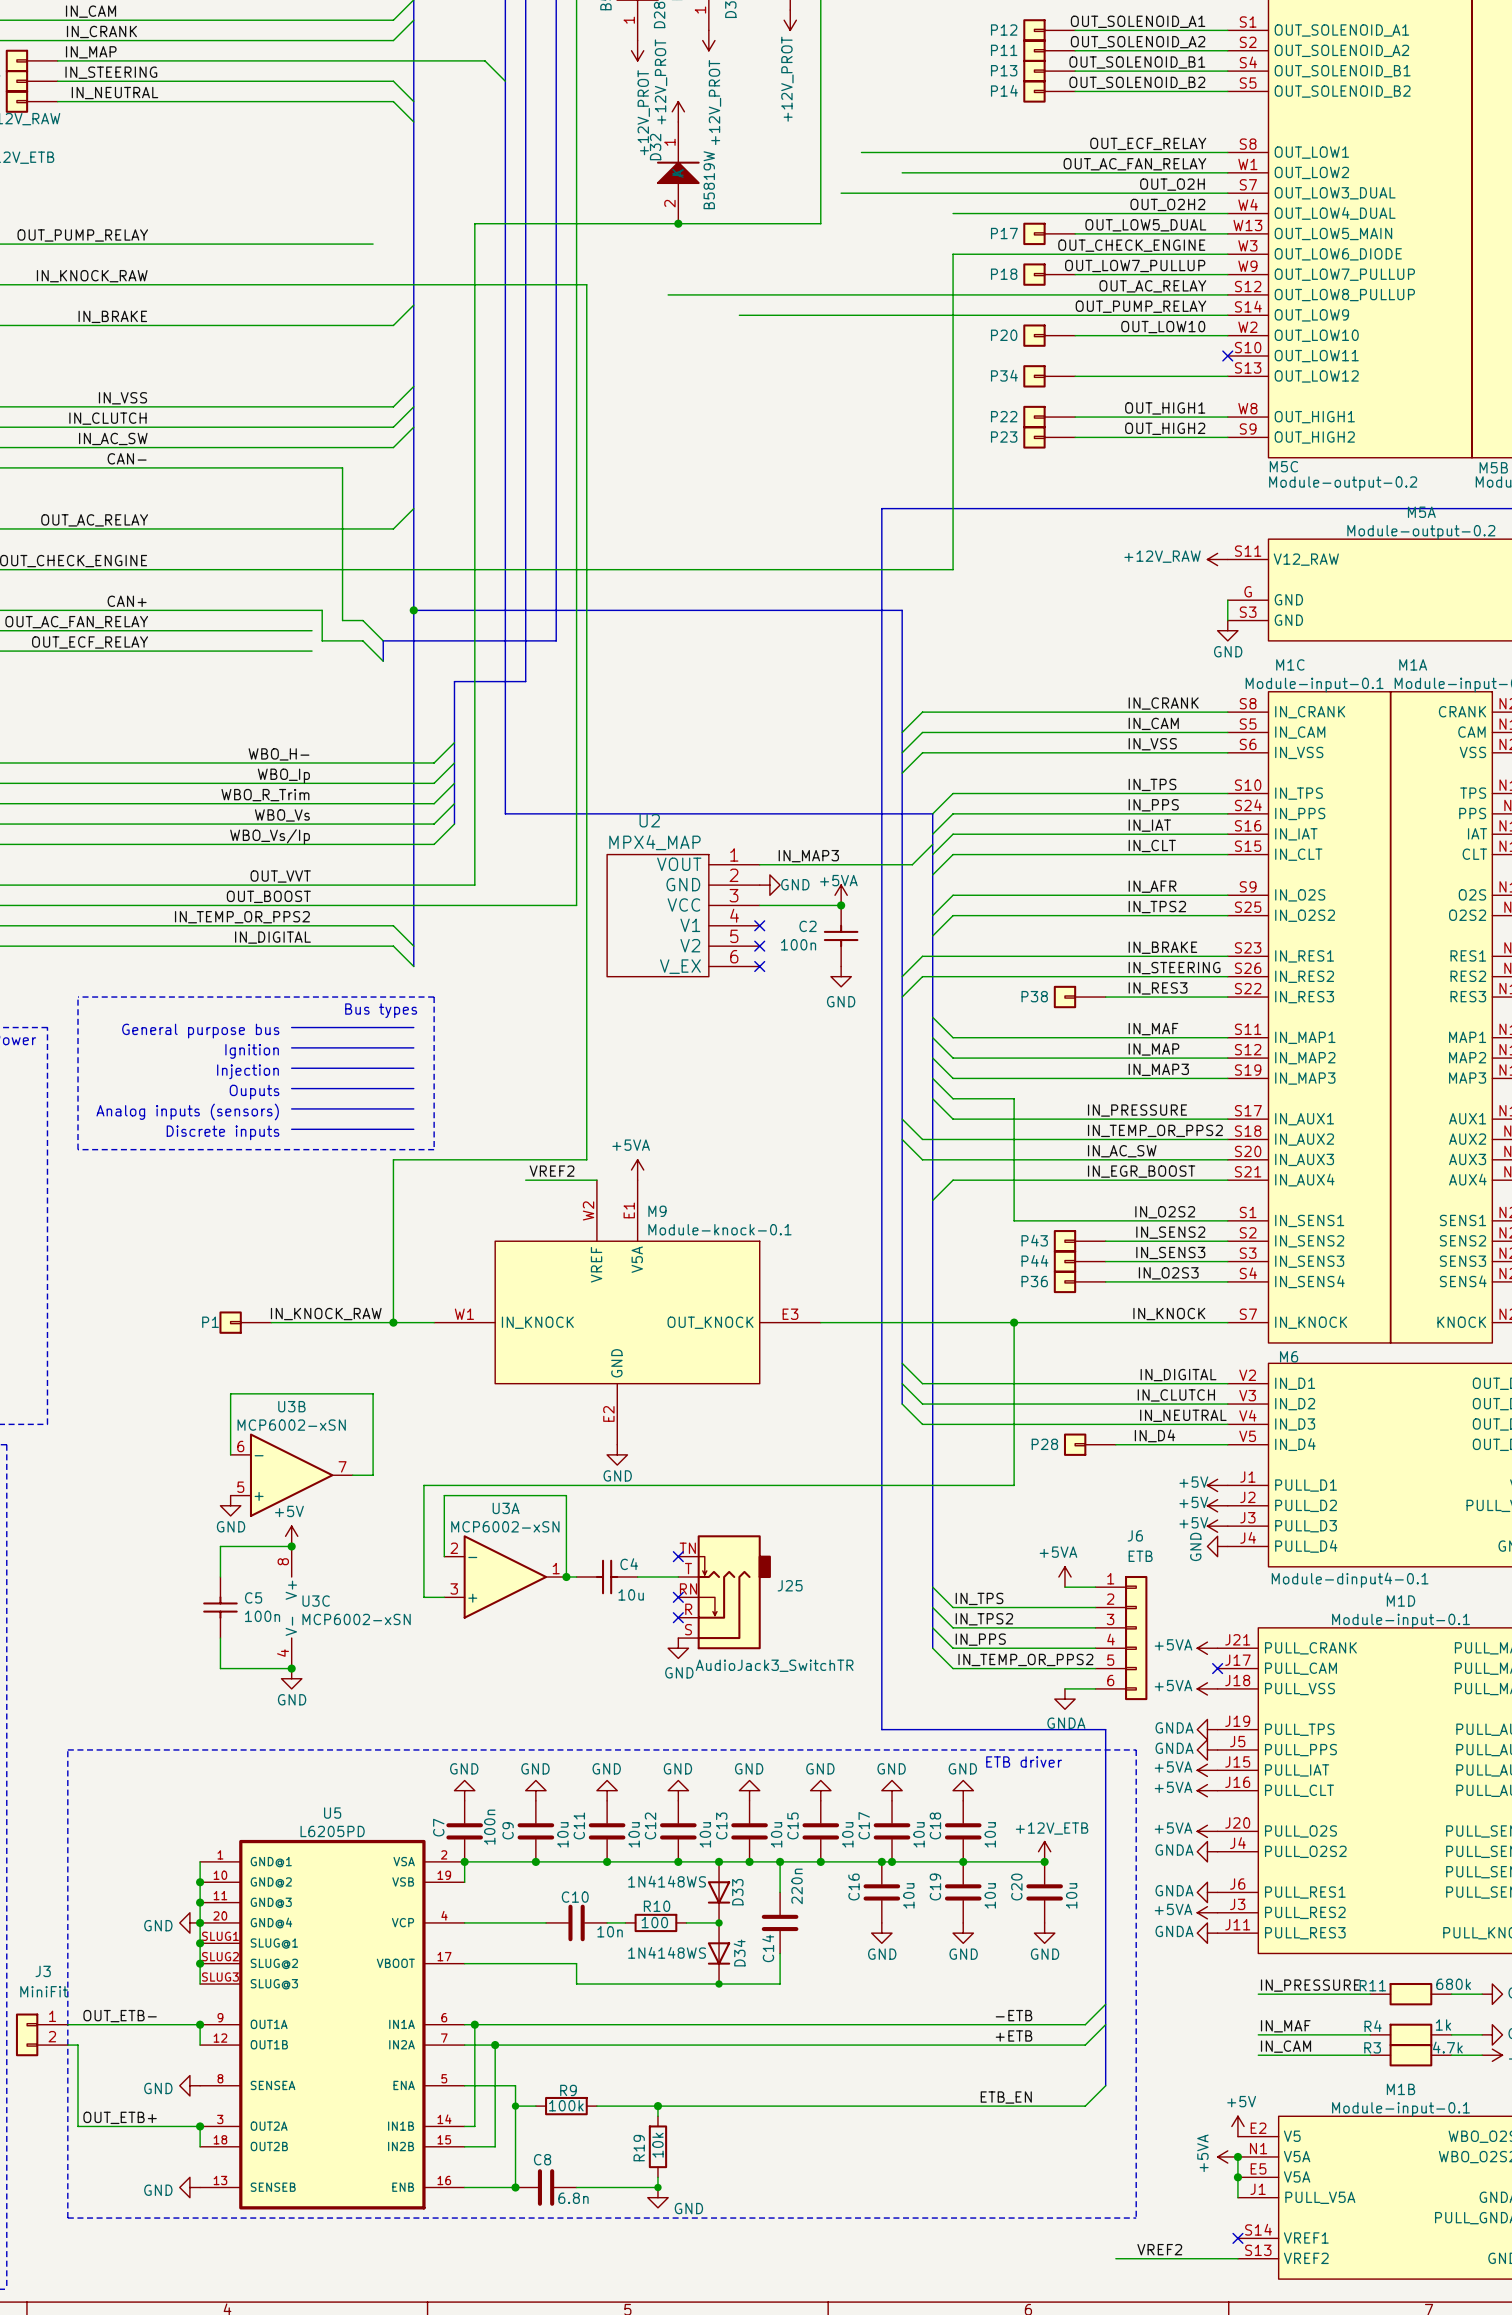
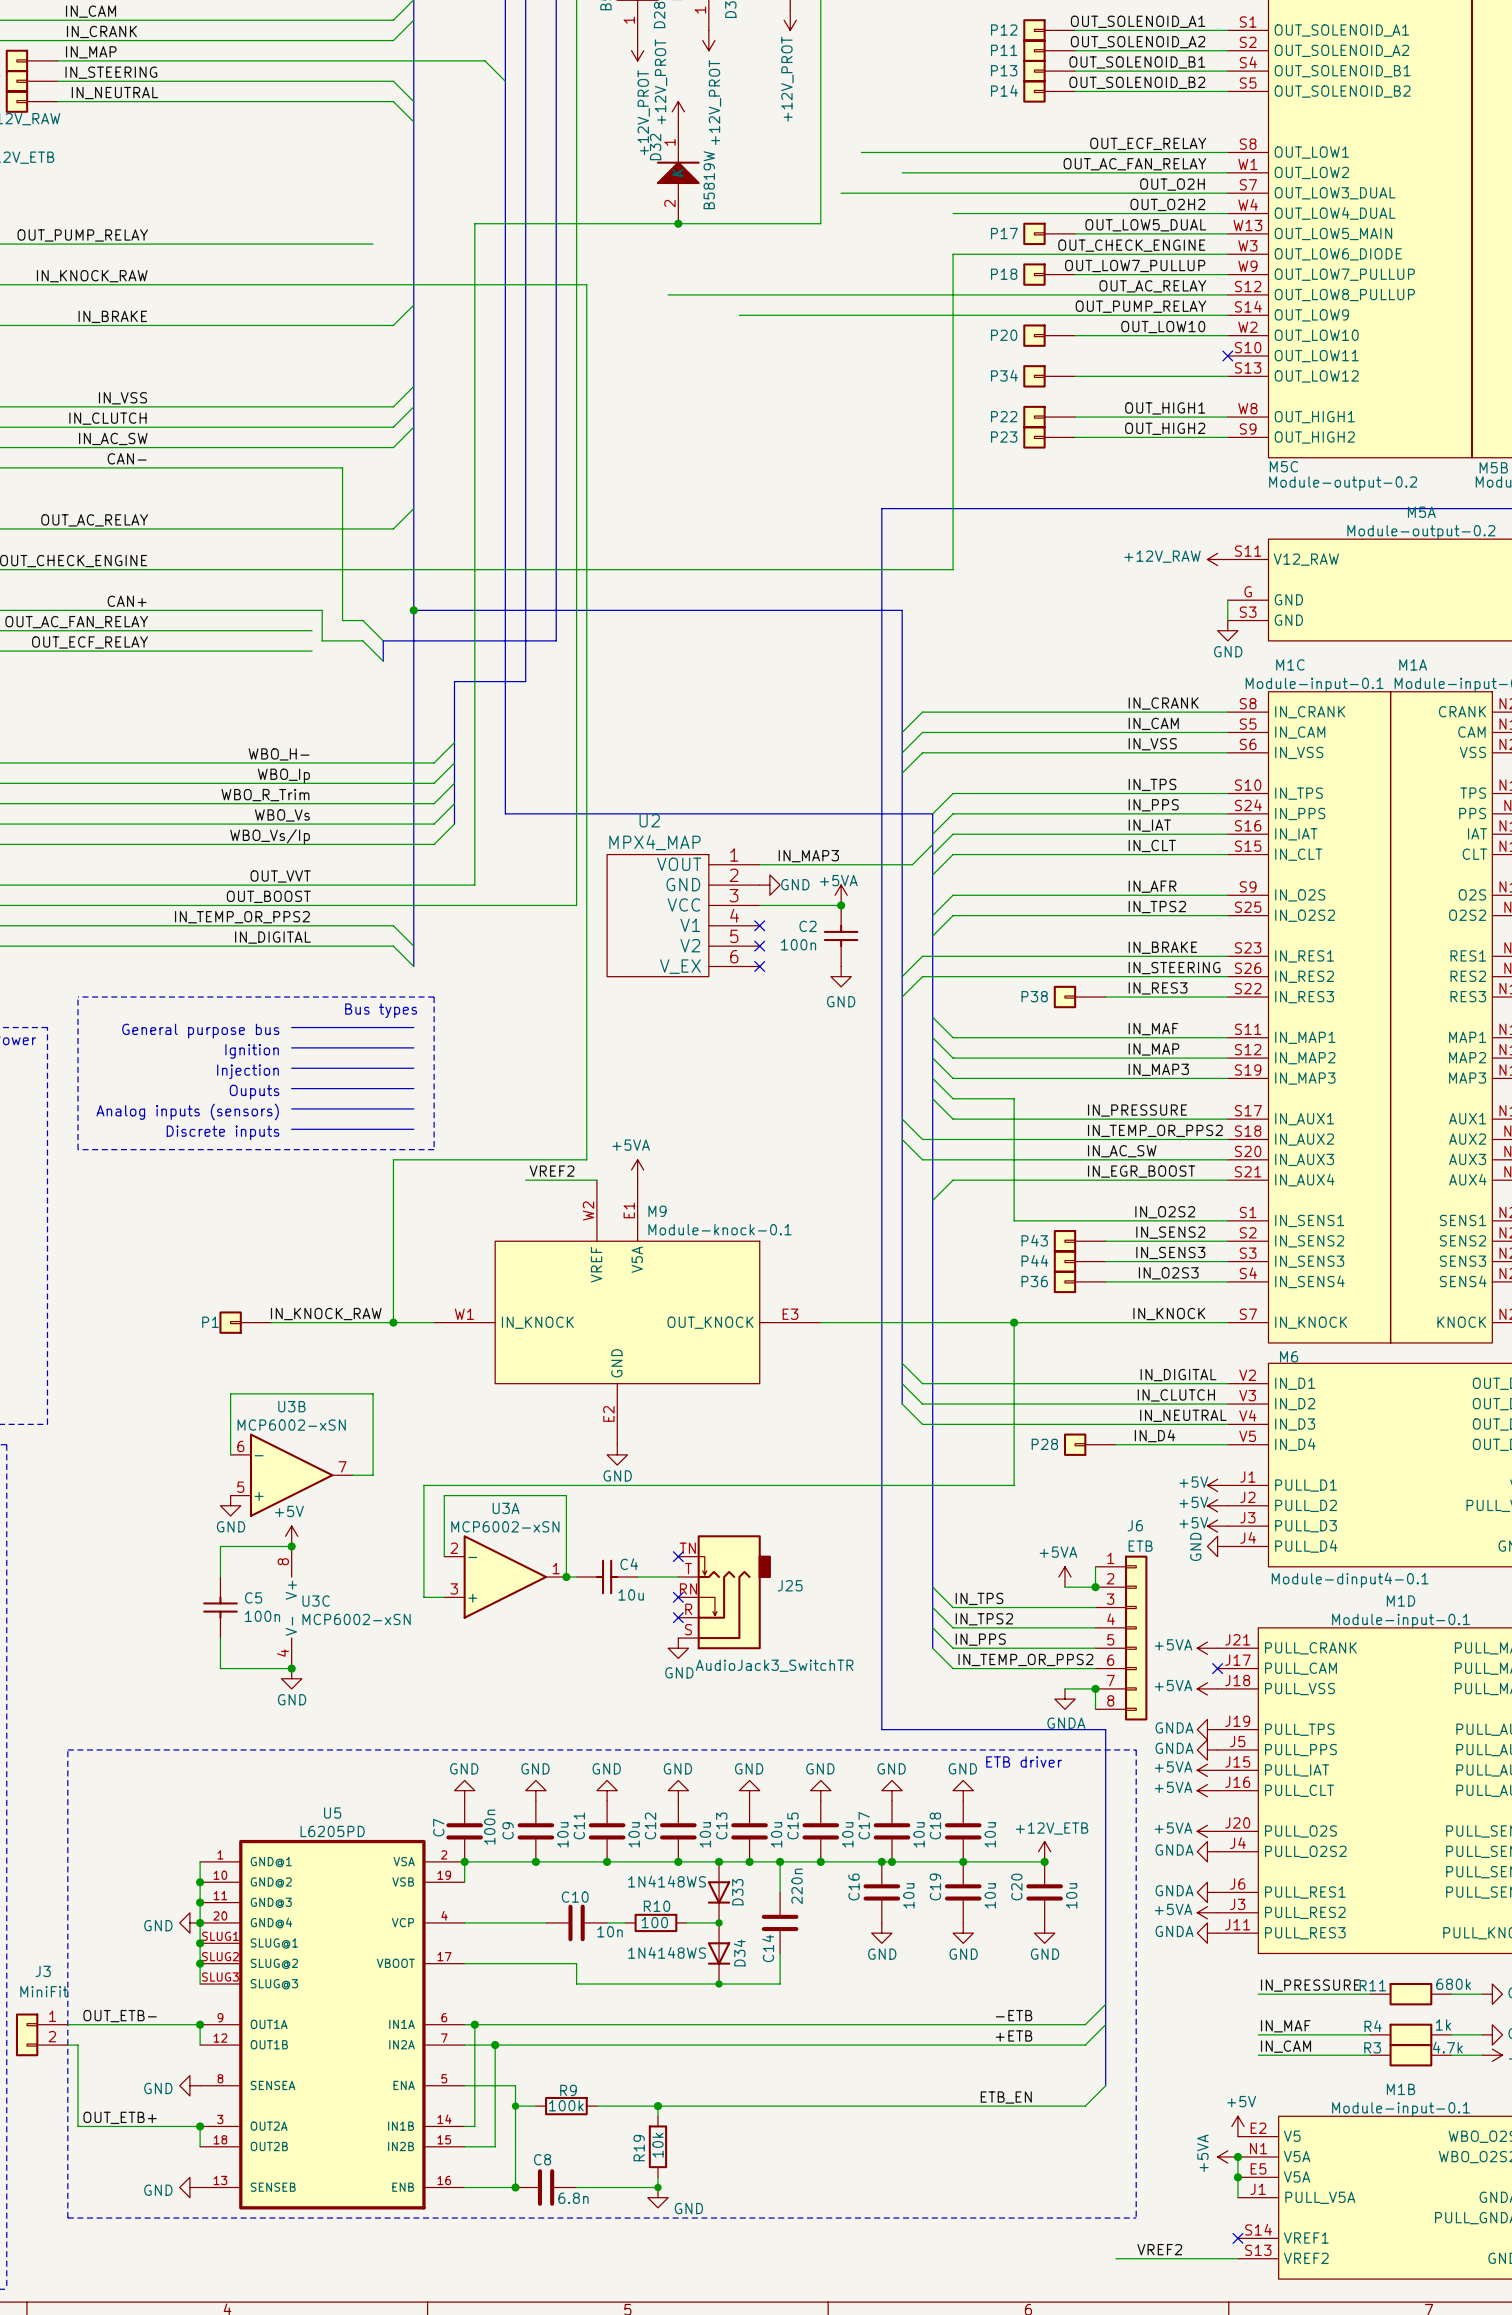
wire: none -> (1095, 1566) (1095, 1587)
J6 symbol: [1095, 1575, 1148, 1701] -> [1095, 1555, 1148, 1721]
junction: none -> (1095, 1587)
wire: none -> (1095, 1688) (1095, 1709)
junction: none -> (1095, 1688)

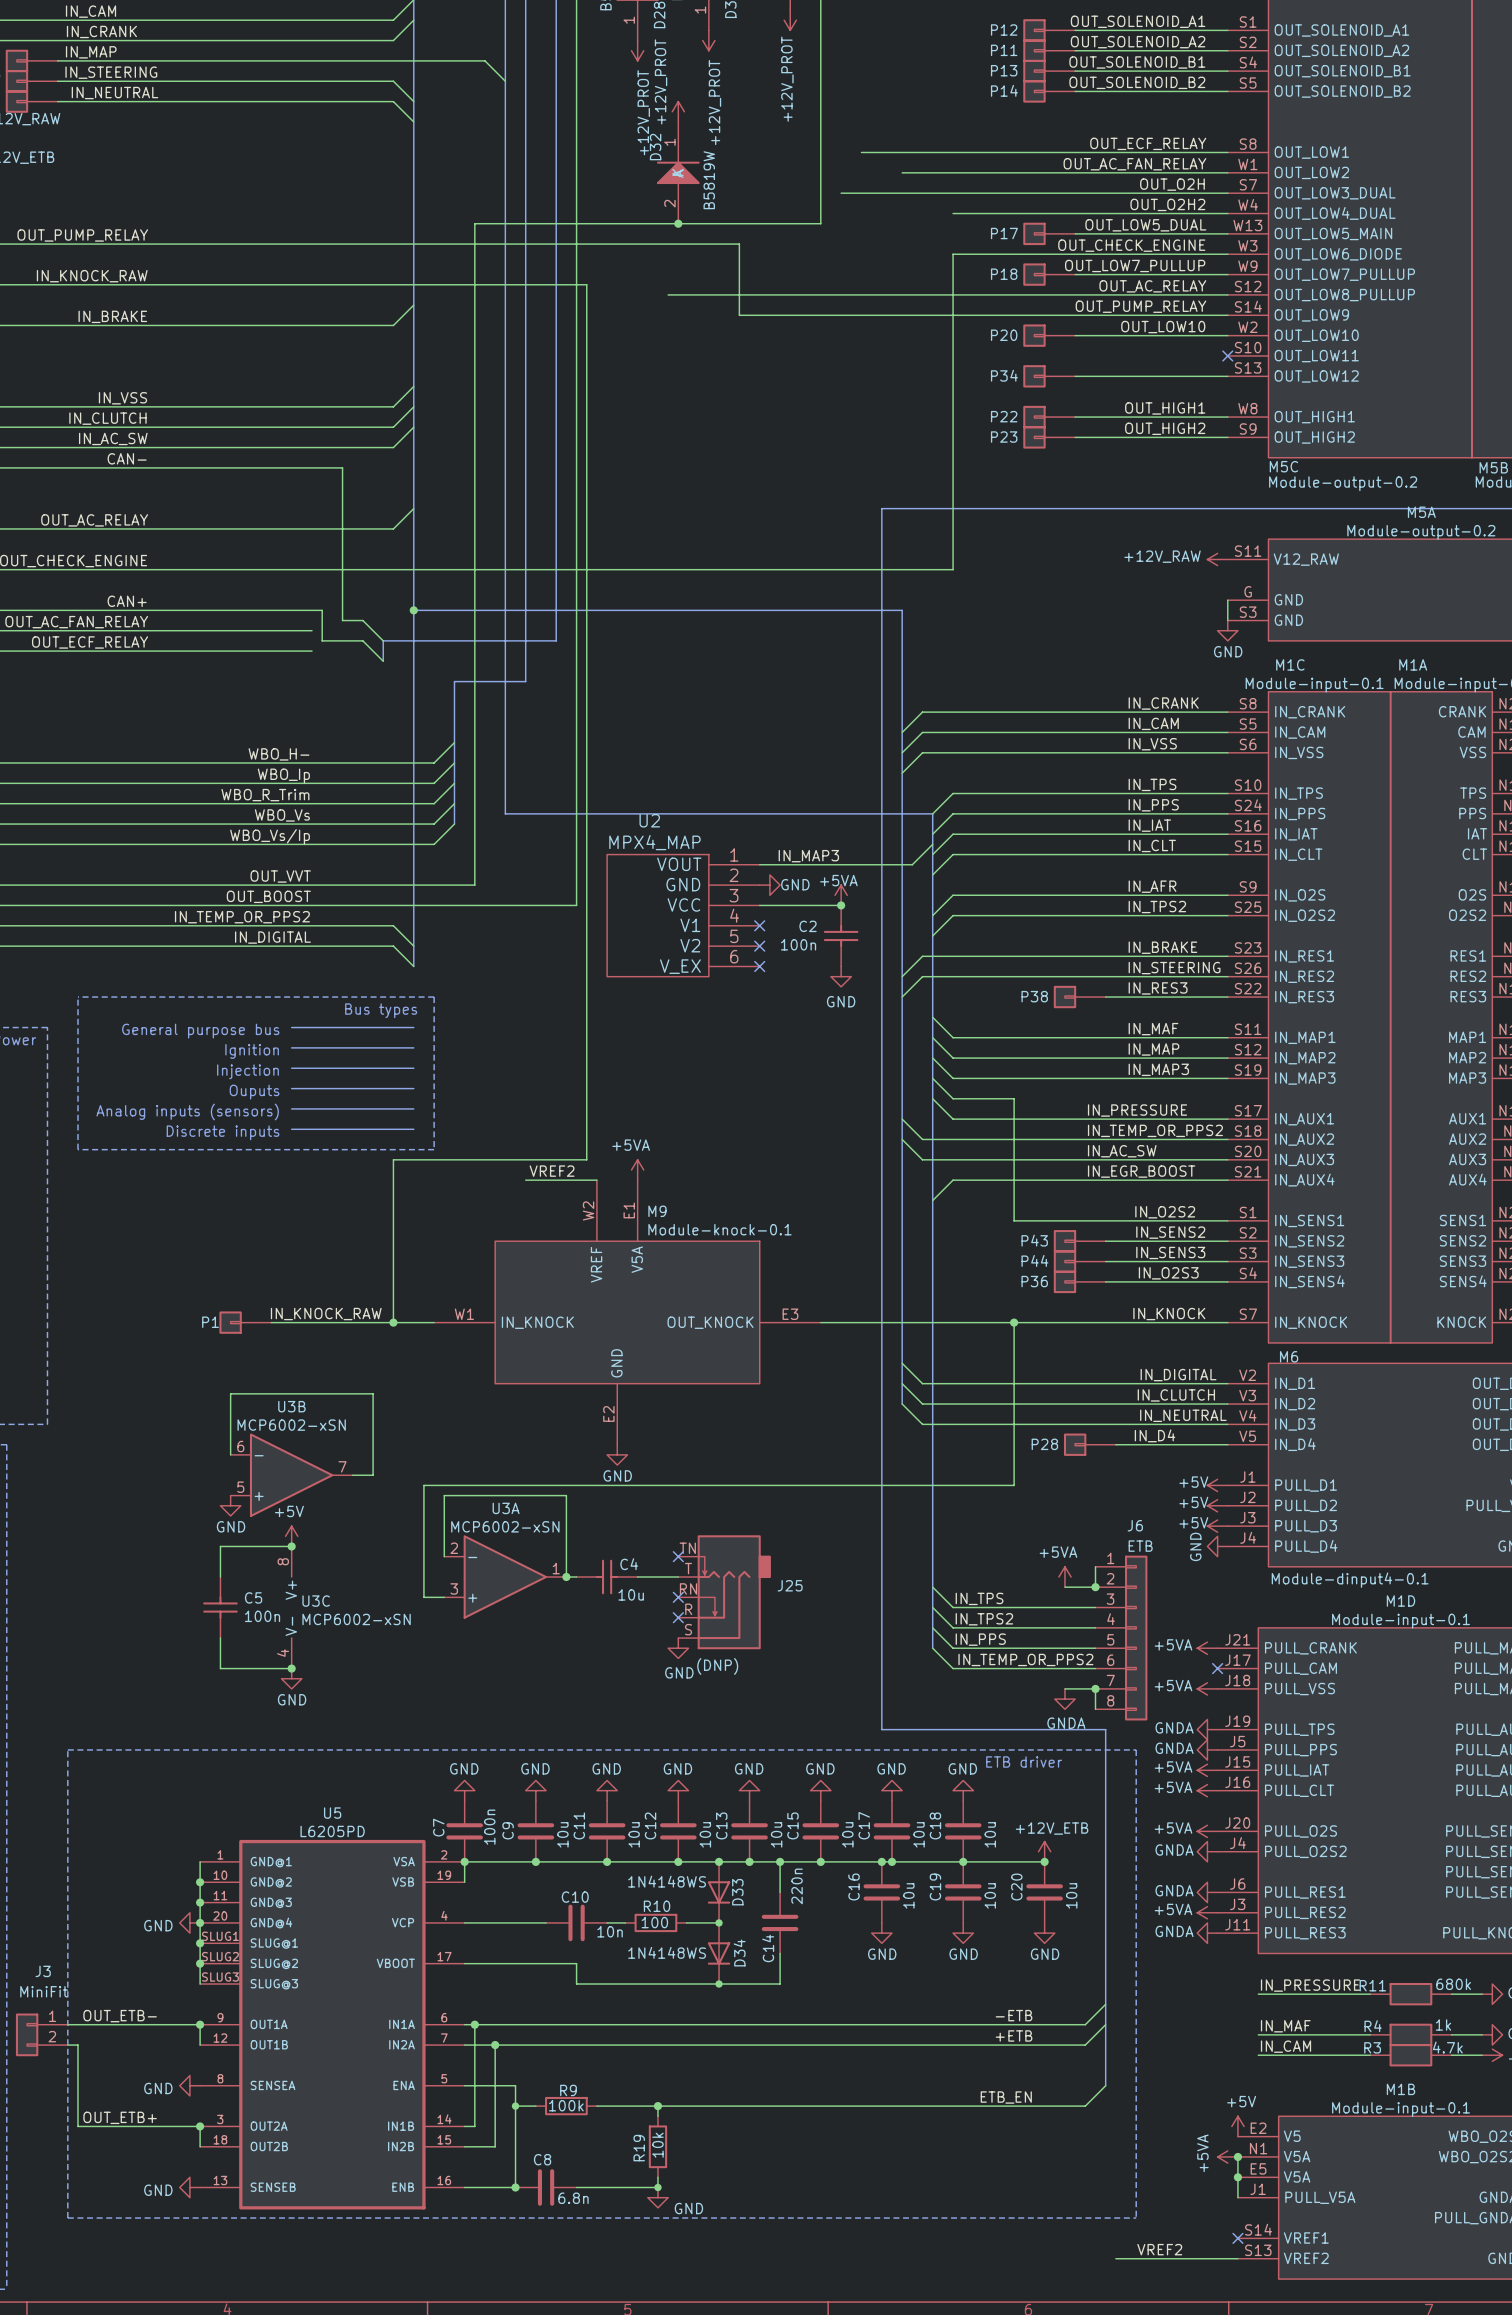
wire: none -> (373, 244) (739, 244) (739, 315)
J25 value: AudioJack3_SwitchTR (774, 1665) -> (DNP) (717, 1666)

